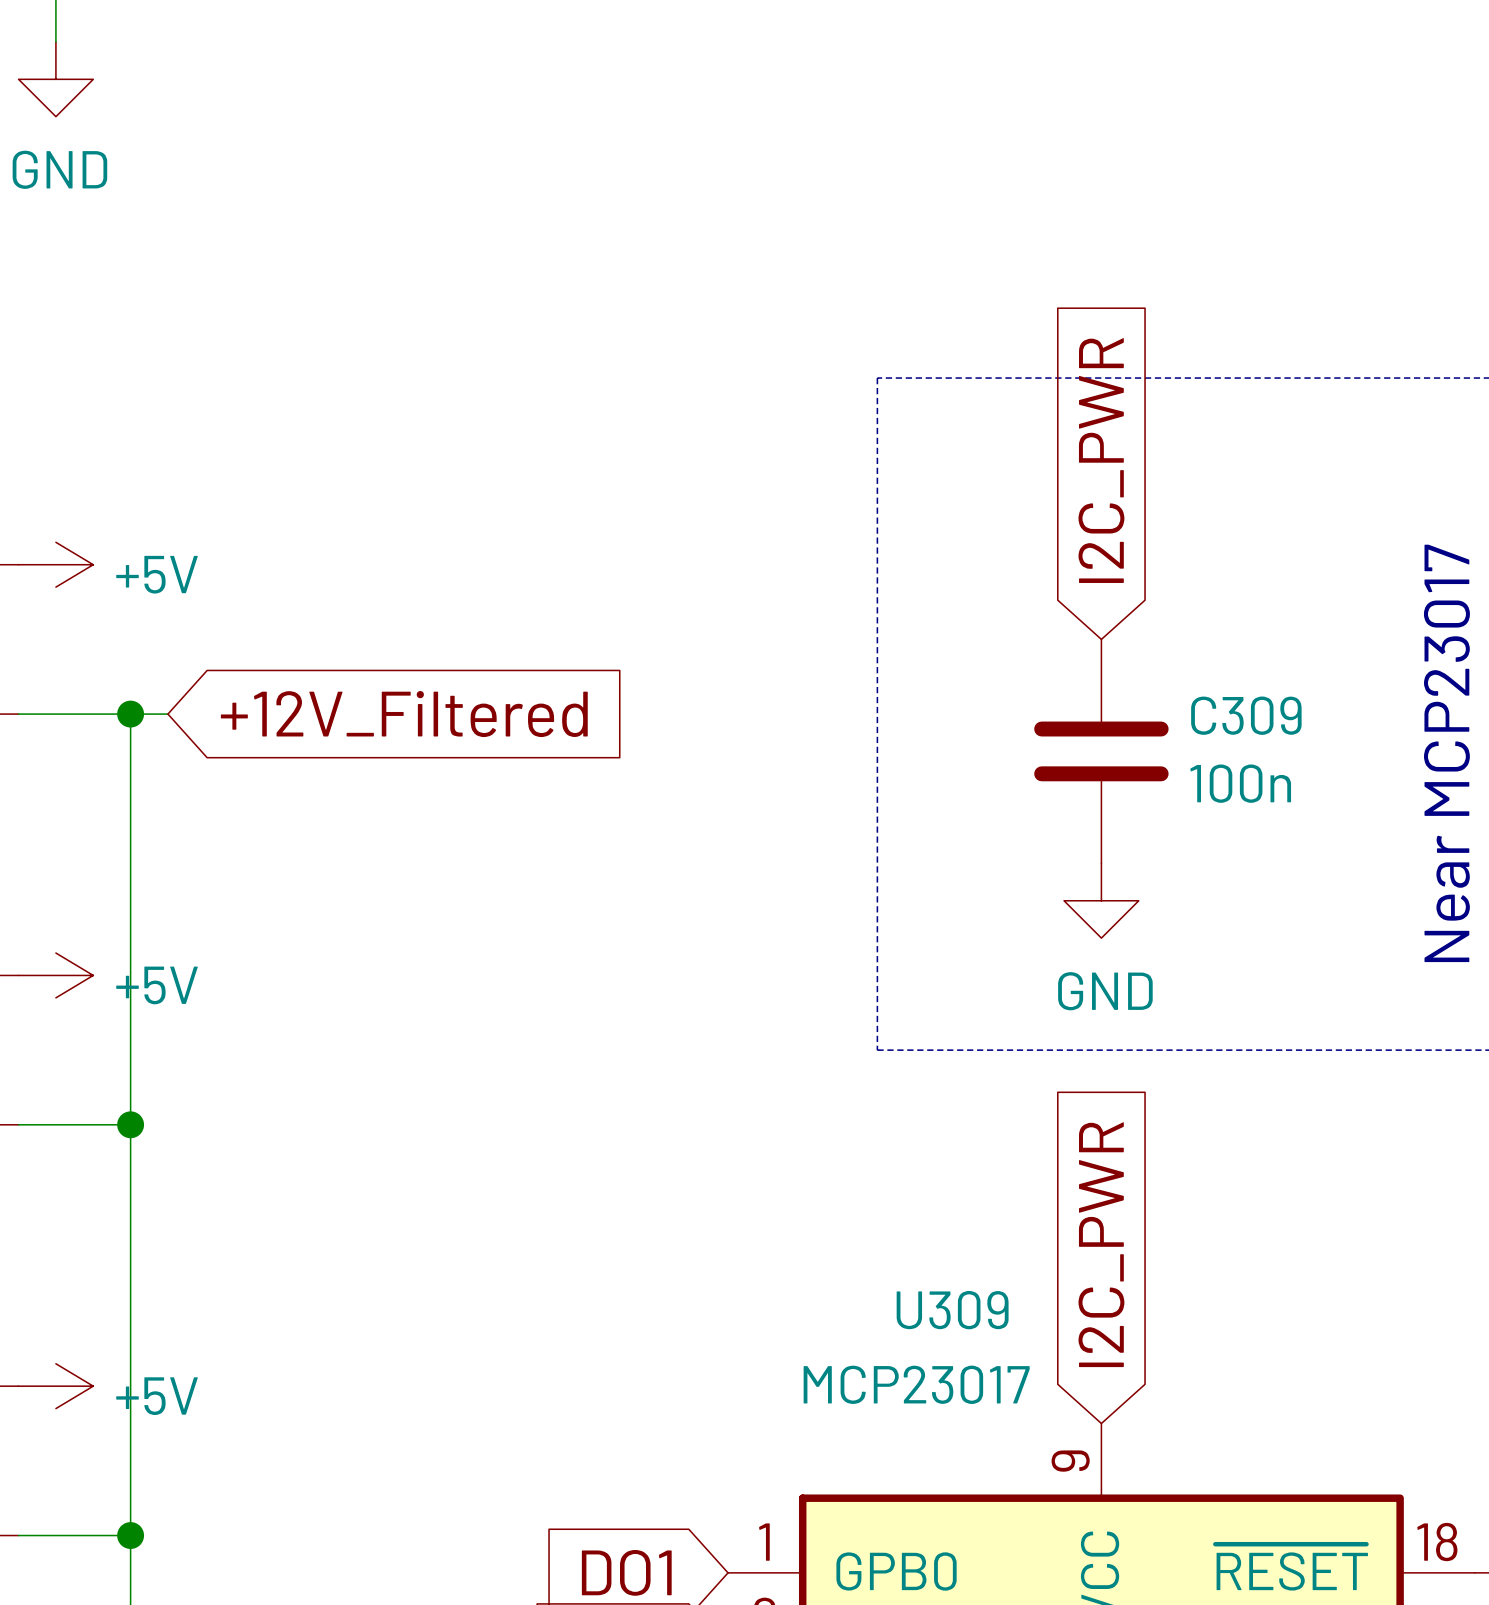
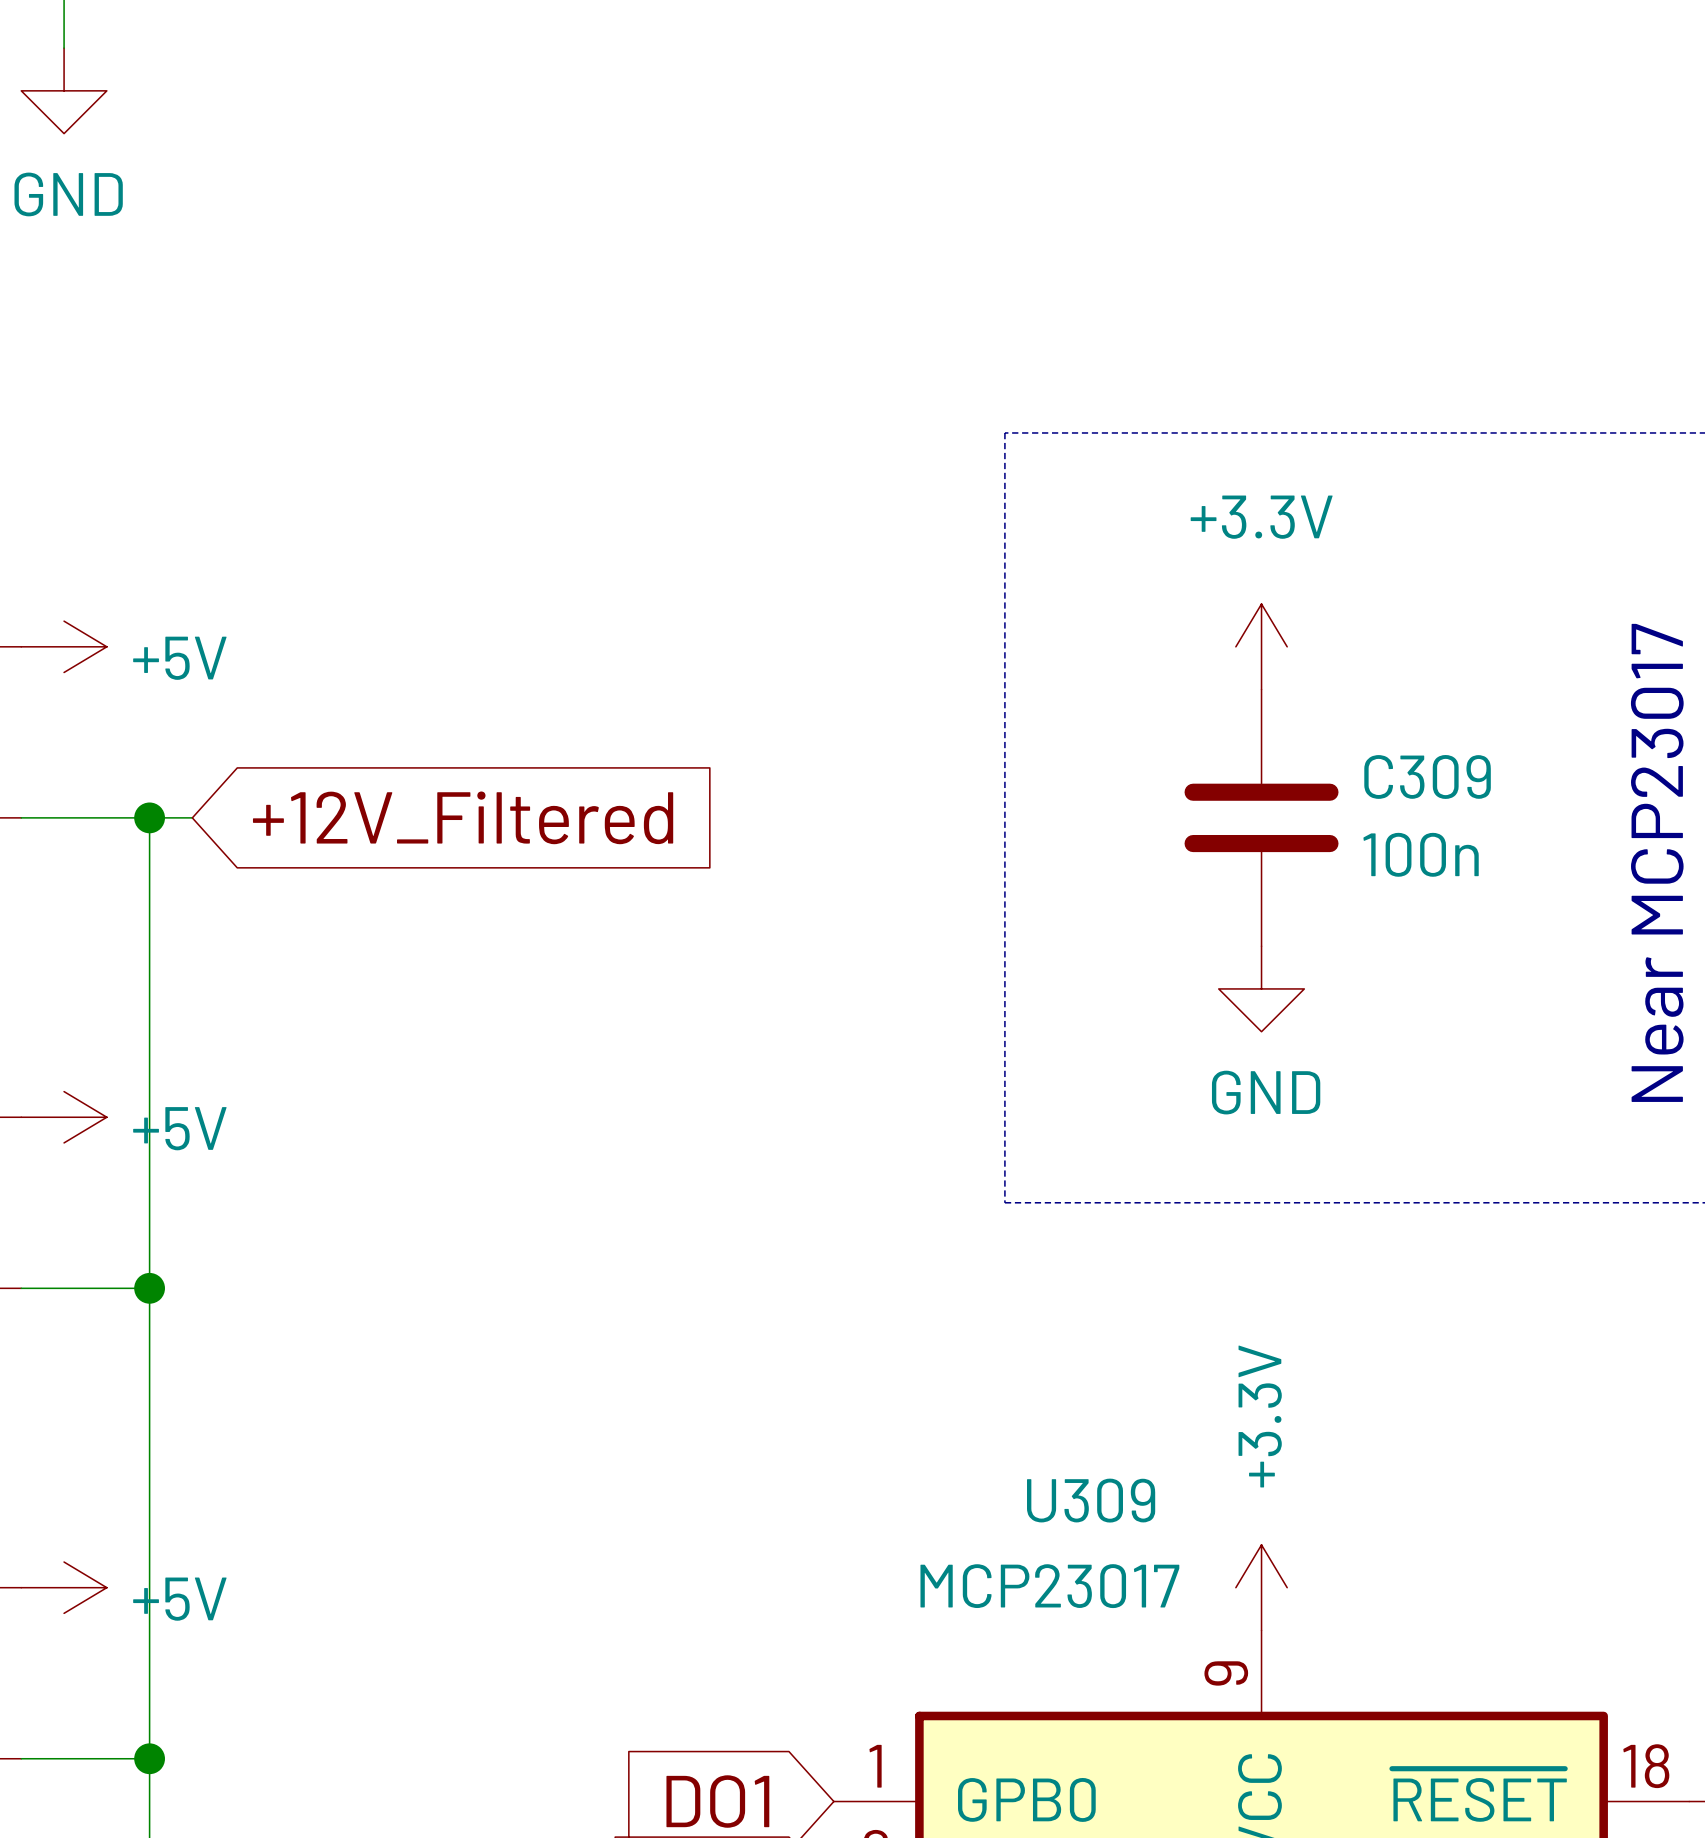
global label: I2C_PWR (1101, 460) -> none
power symbol: none -> +3.3V (1261, 646)
C309 position: (1101, 751) -> (1261, 817)
power symbol position: GND (1101, 900) -> GND (1261, 988)
global label: I2C_PWR (1101, 1244) -> none
power symbol: none -> +3.3V (1261, 1587)

